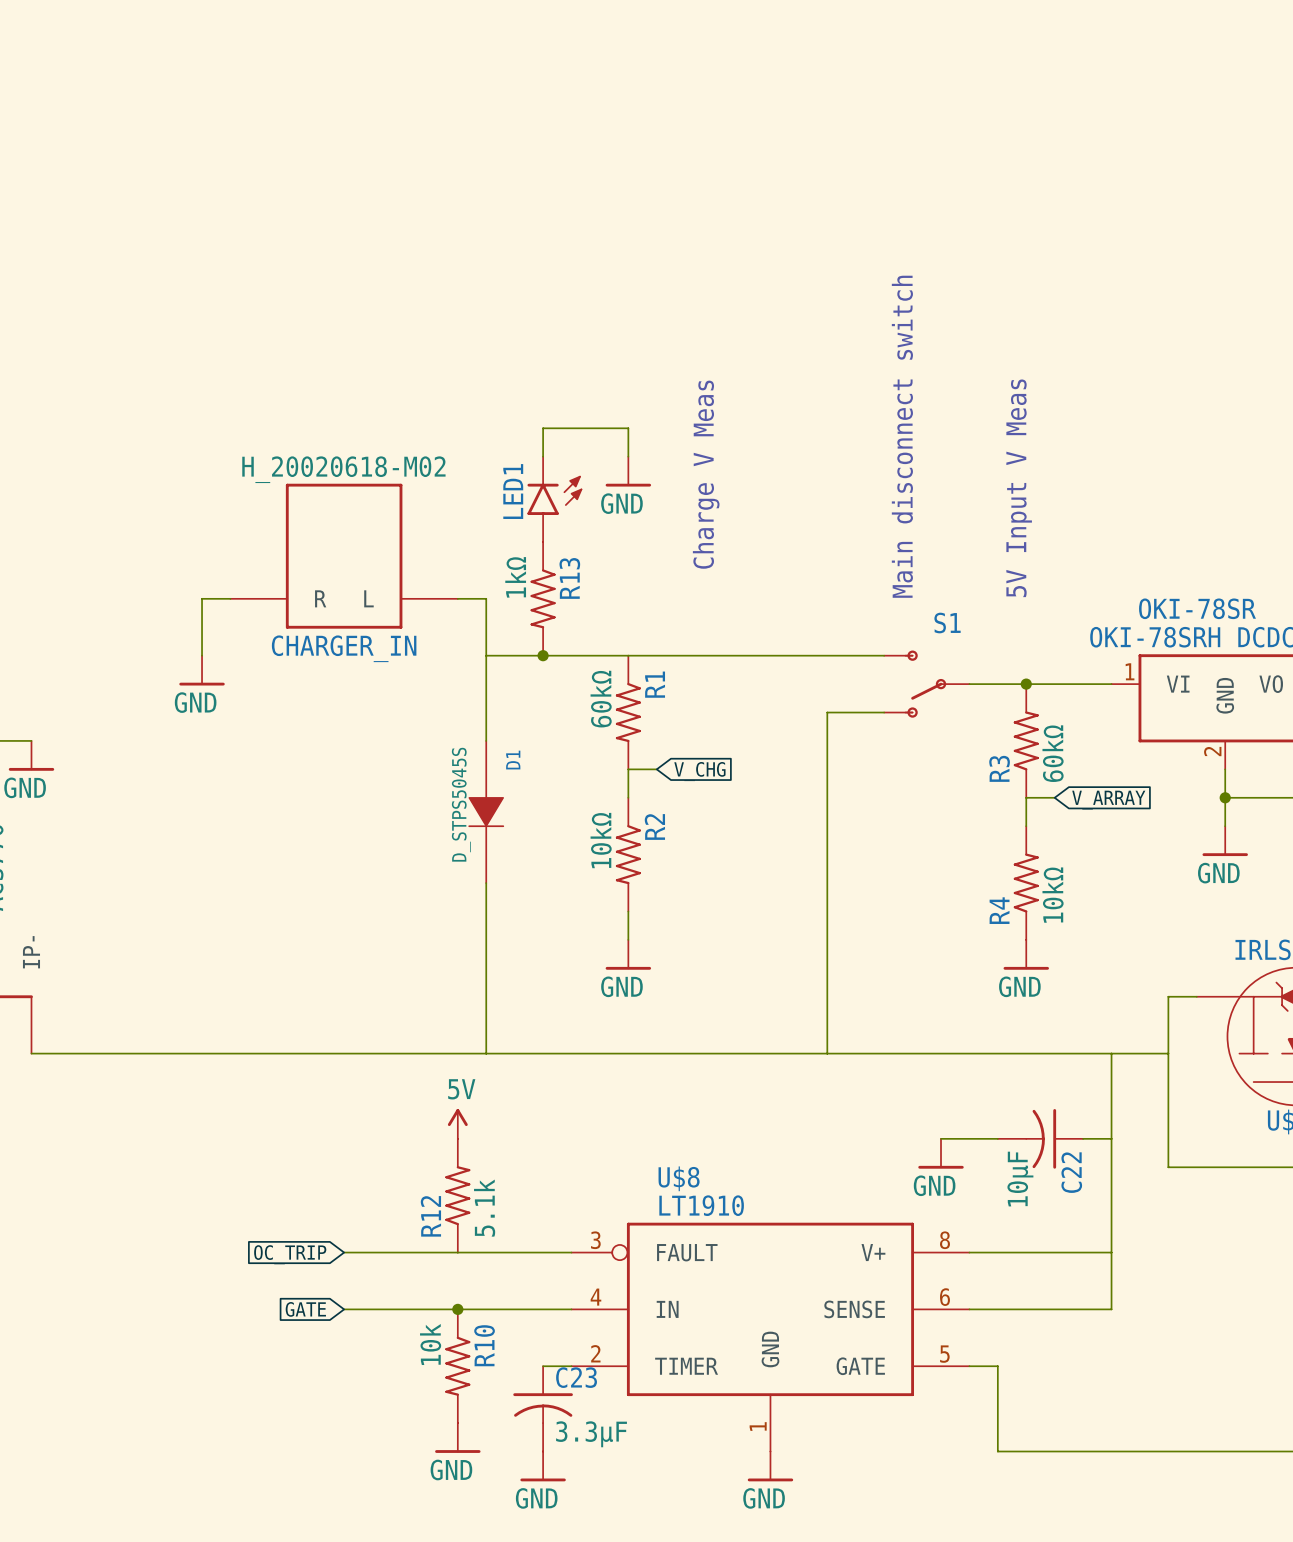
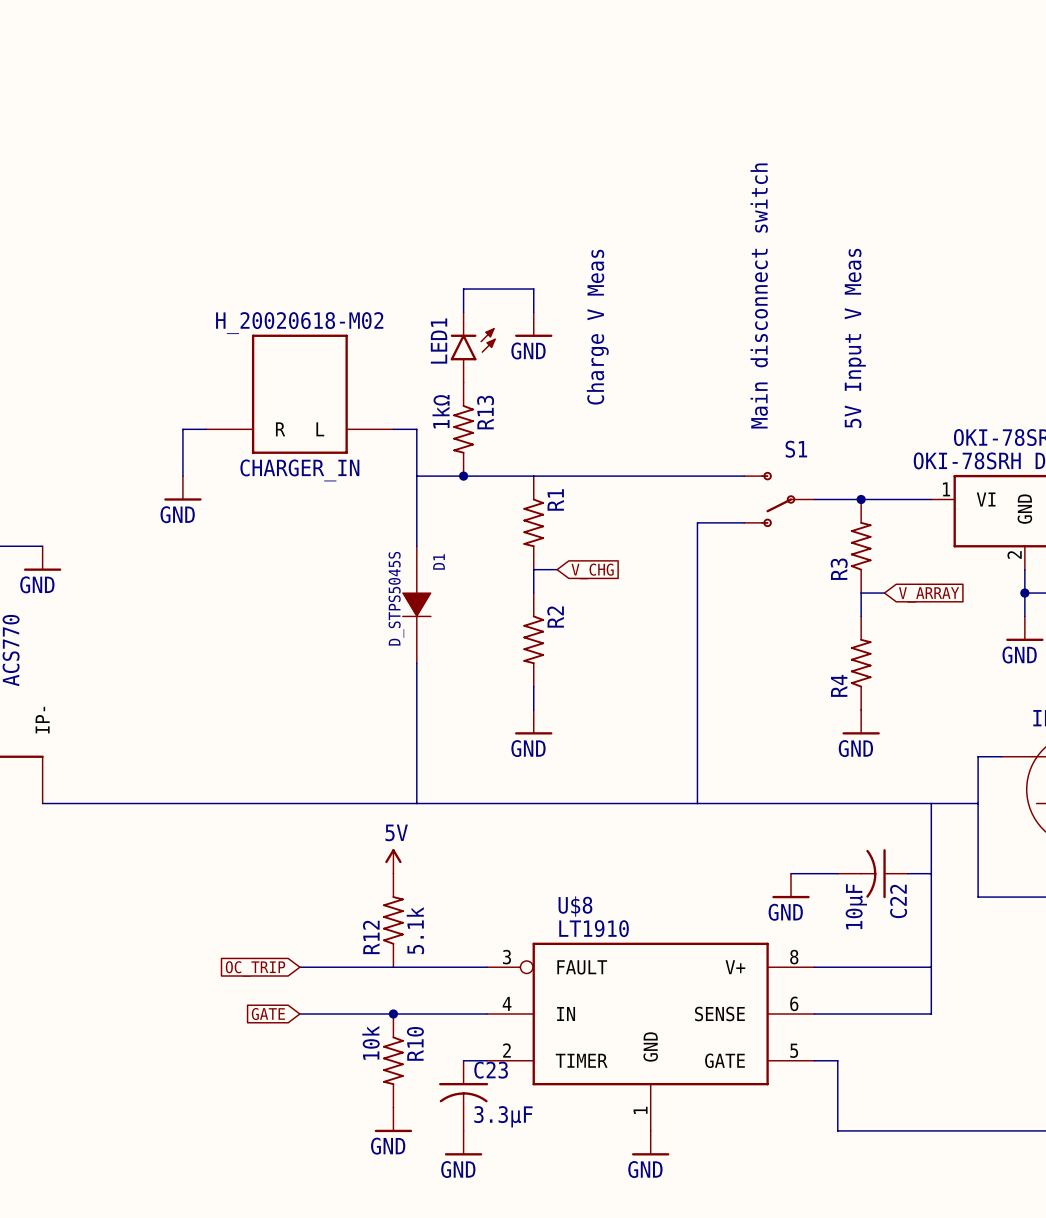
R1 value: 60kΩ (601, 699) -> none
R3 value: 60kΩ (1053, 753) -> none
R2 value: 10kΩ (601, 840) -> none
R4 value: 10kΩ (1053, 895) -> none

